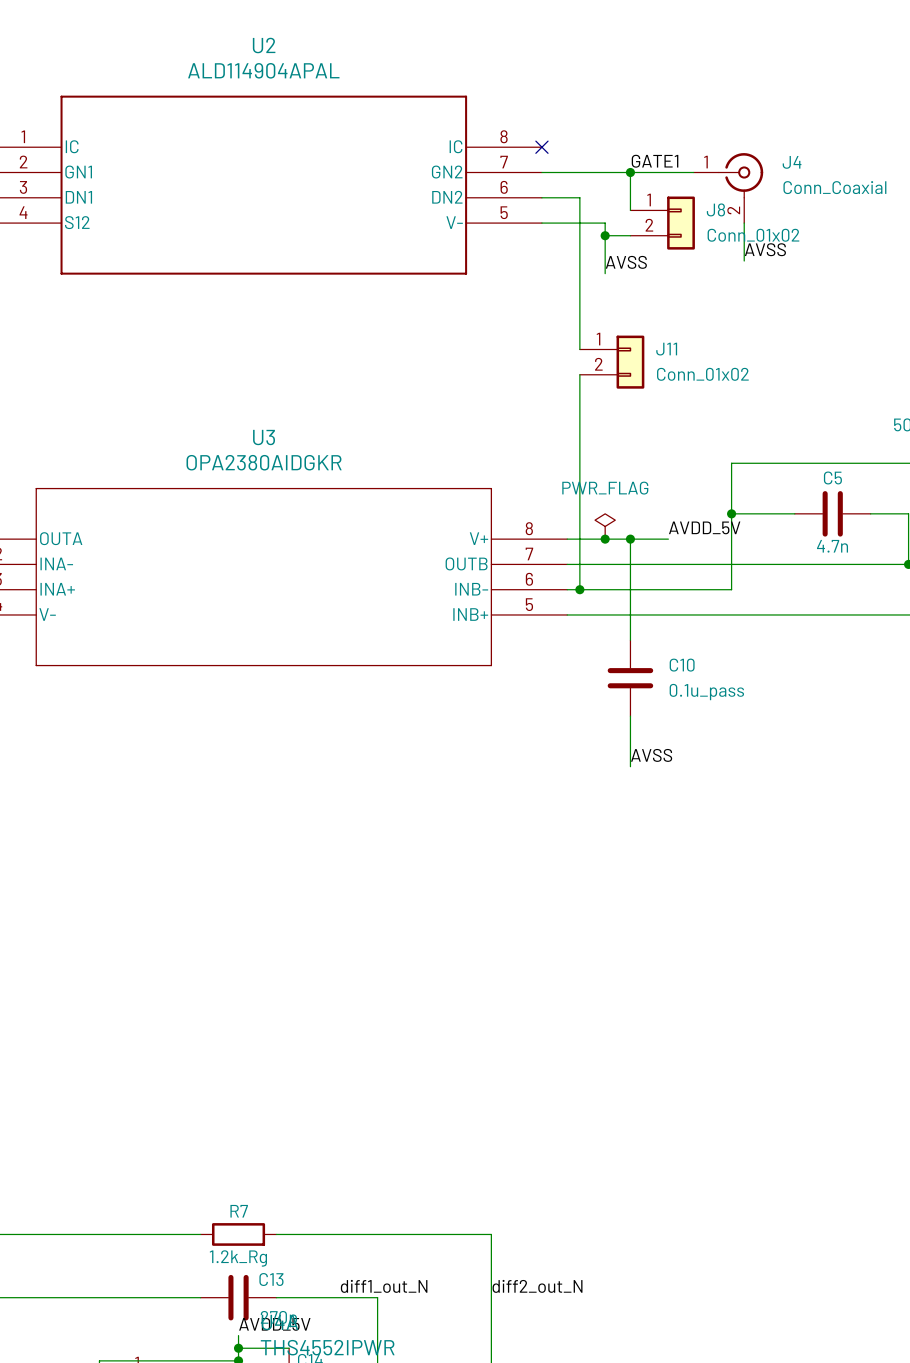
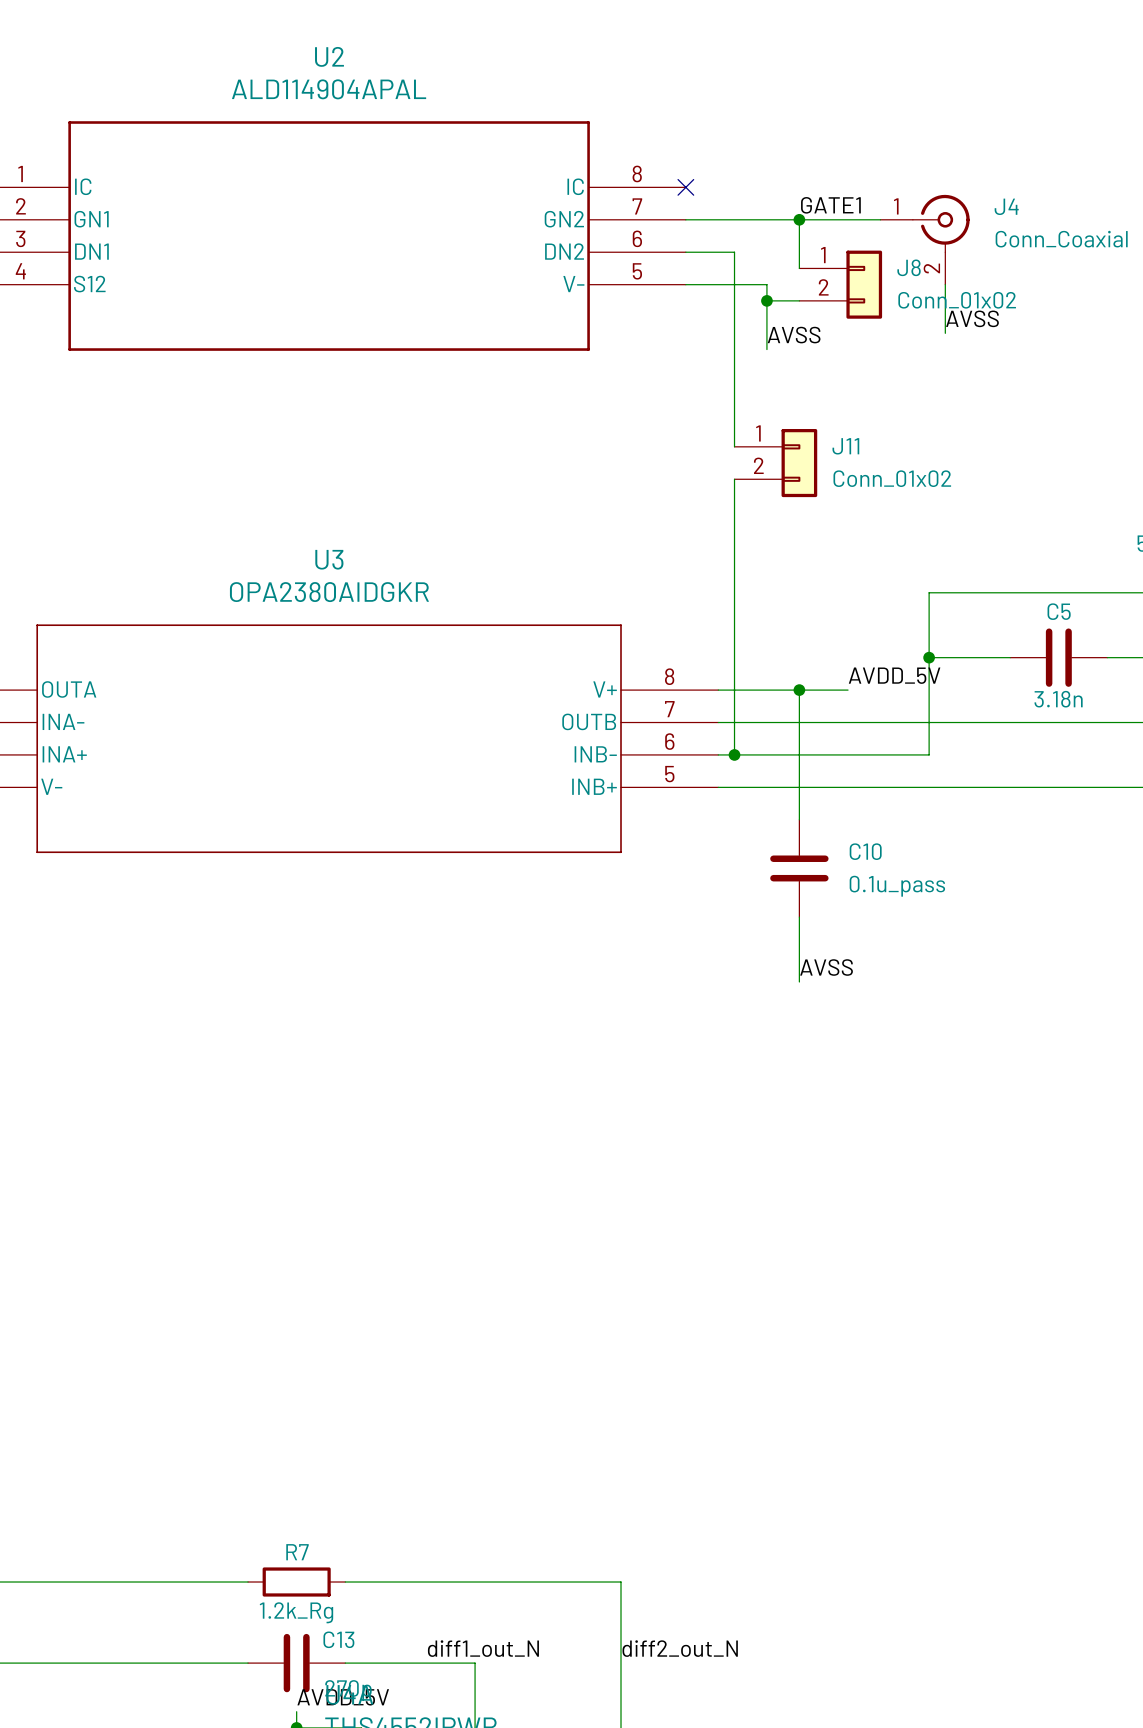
power symbol: PWR_FLAG (605, 526) -> none
junction: (605, 539) -> none
C5 value: 4.7n (832, 546) -> 3.18n (1058, 699)

